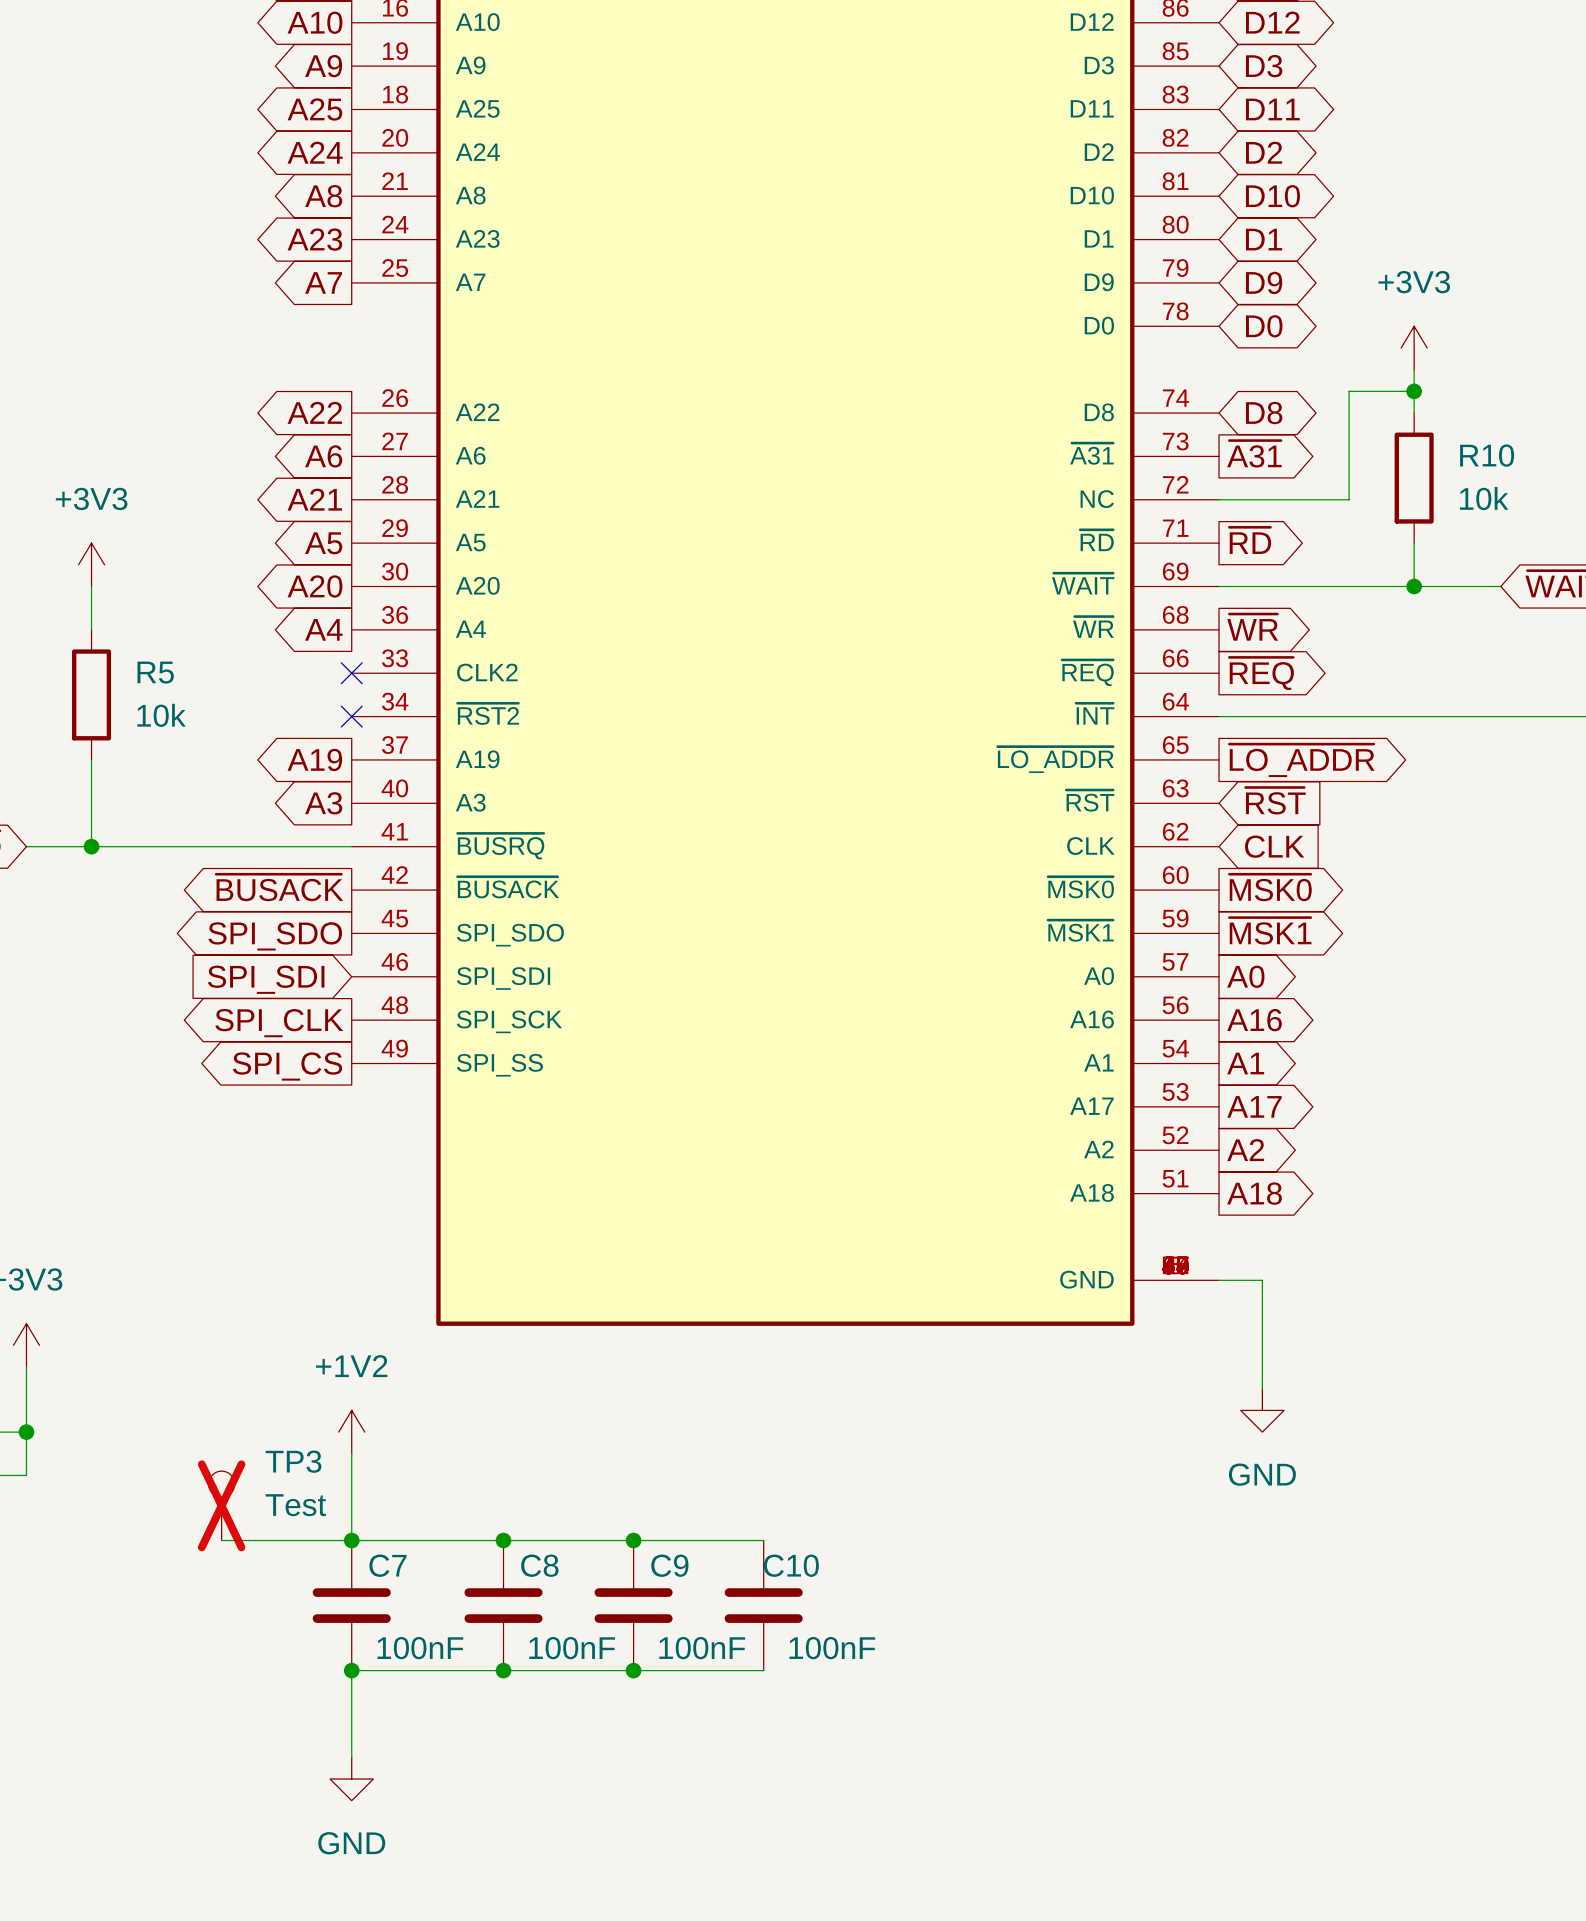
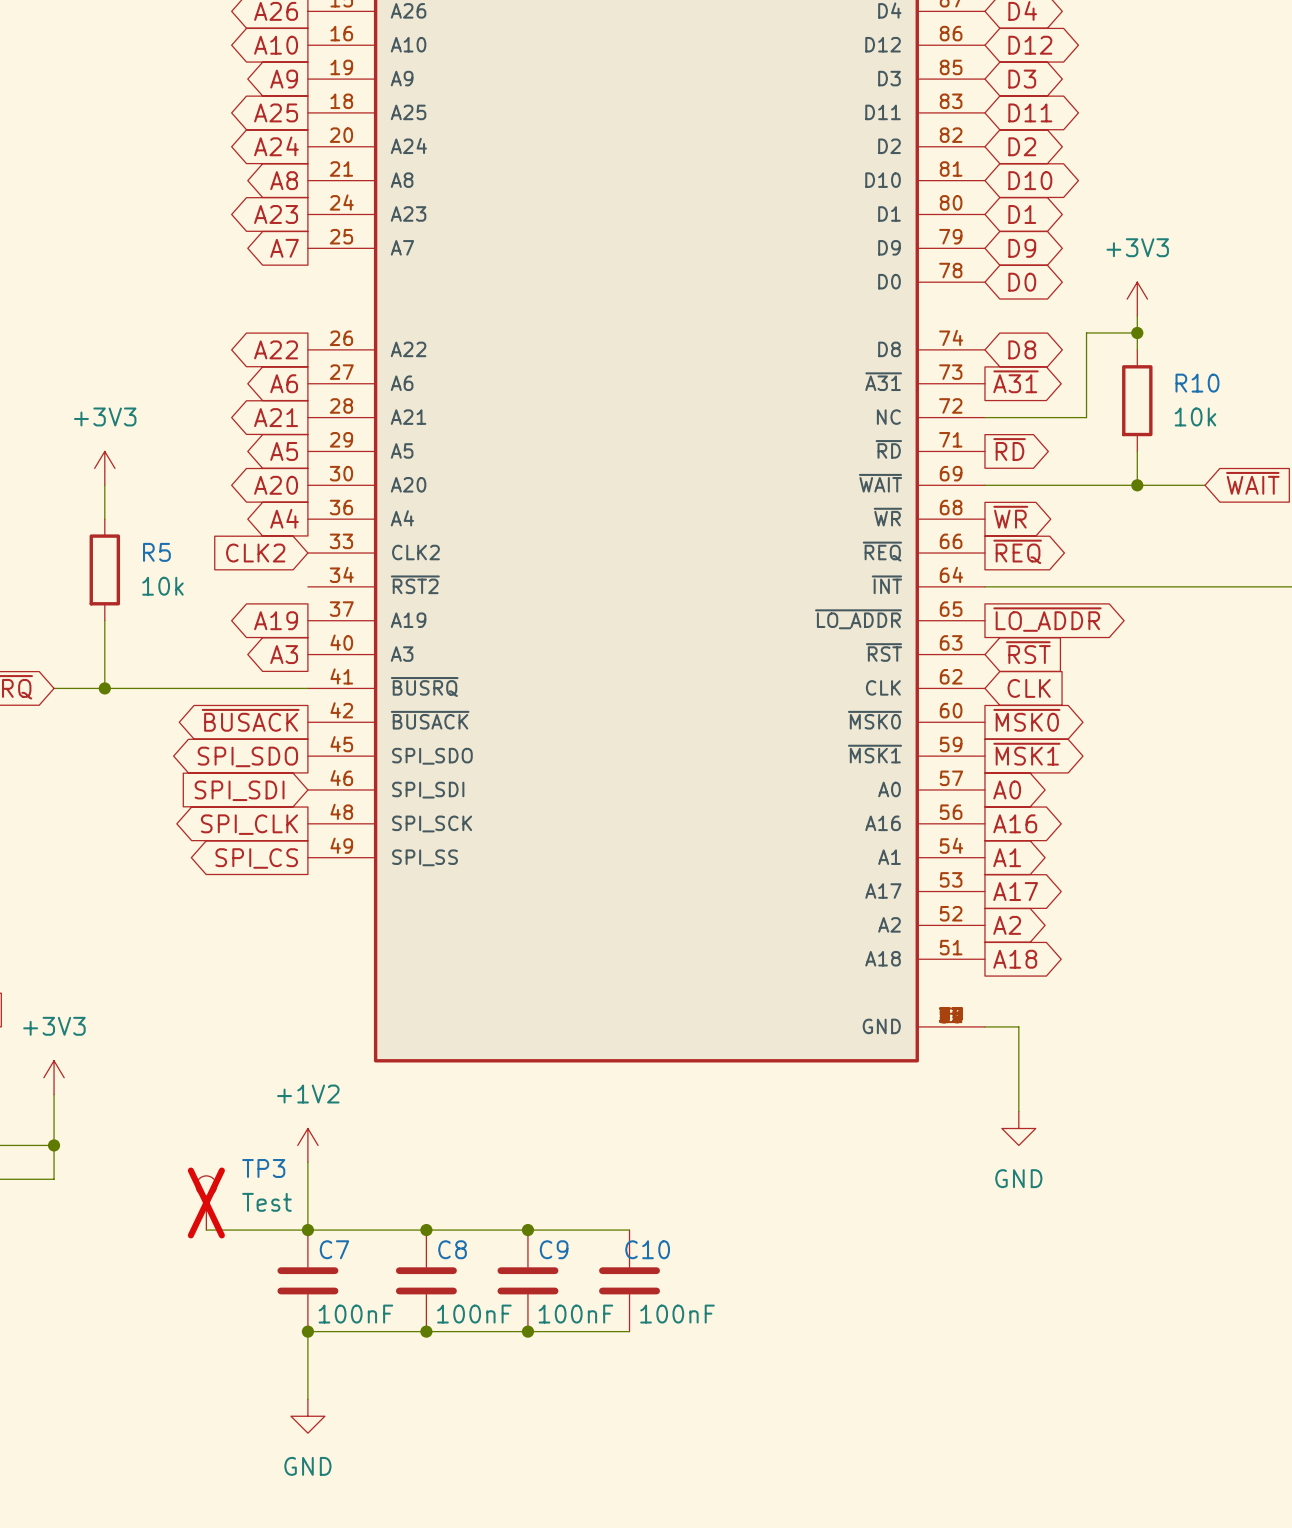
global label: none -> CLK2 (255, 553)
no-connect mark: (351, 673) -> none
no-connect mark: (351, 716) -> none

